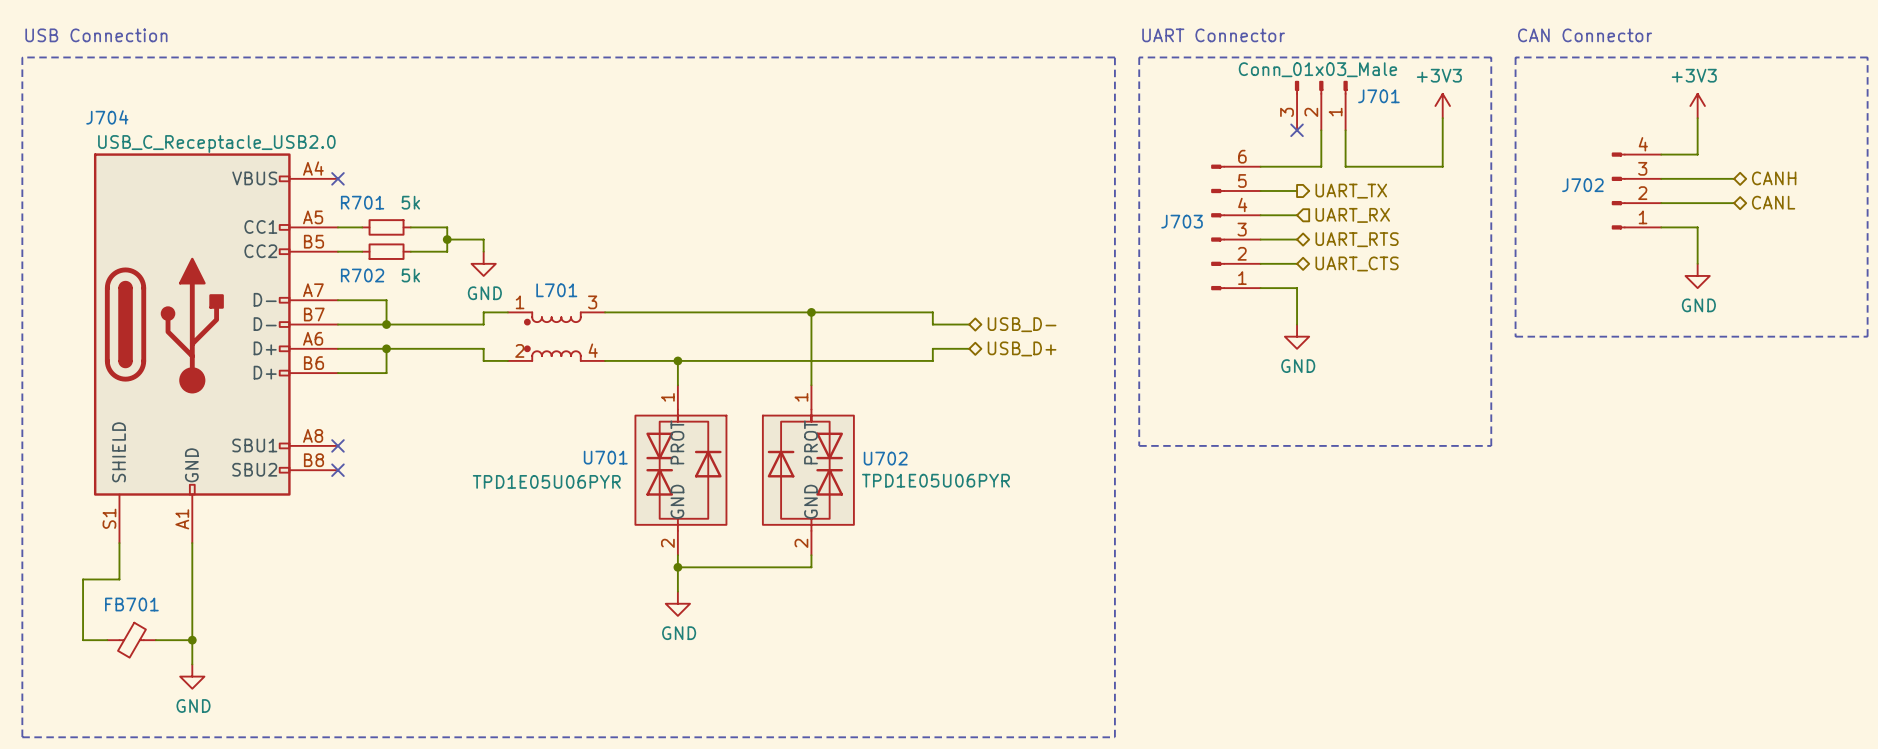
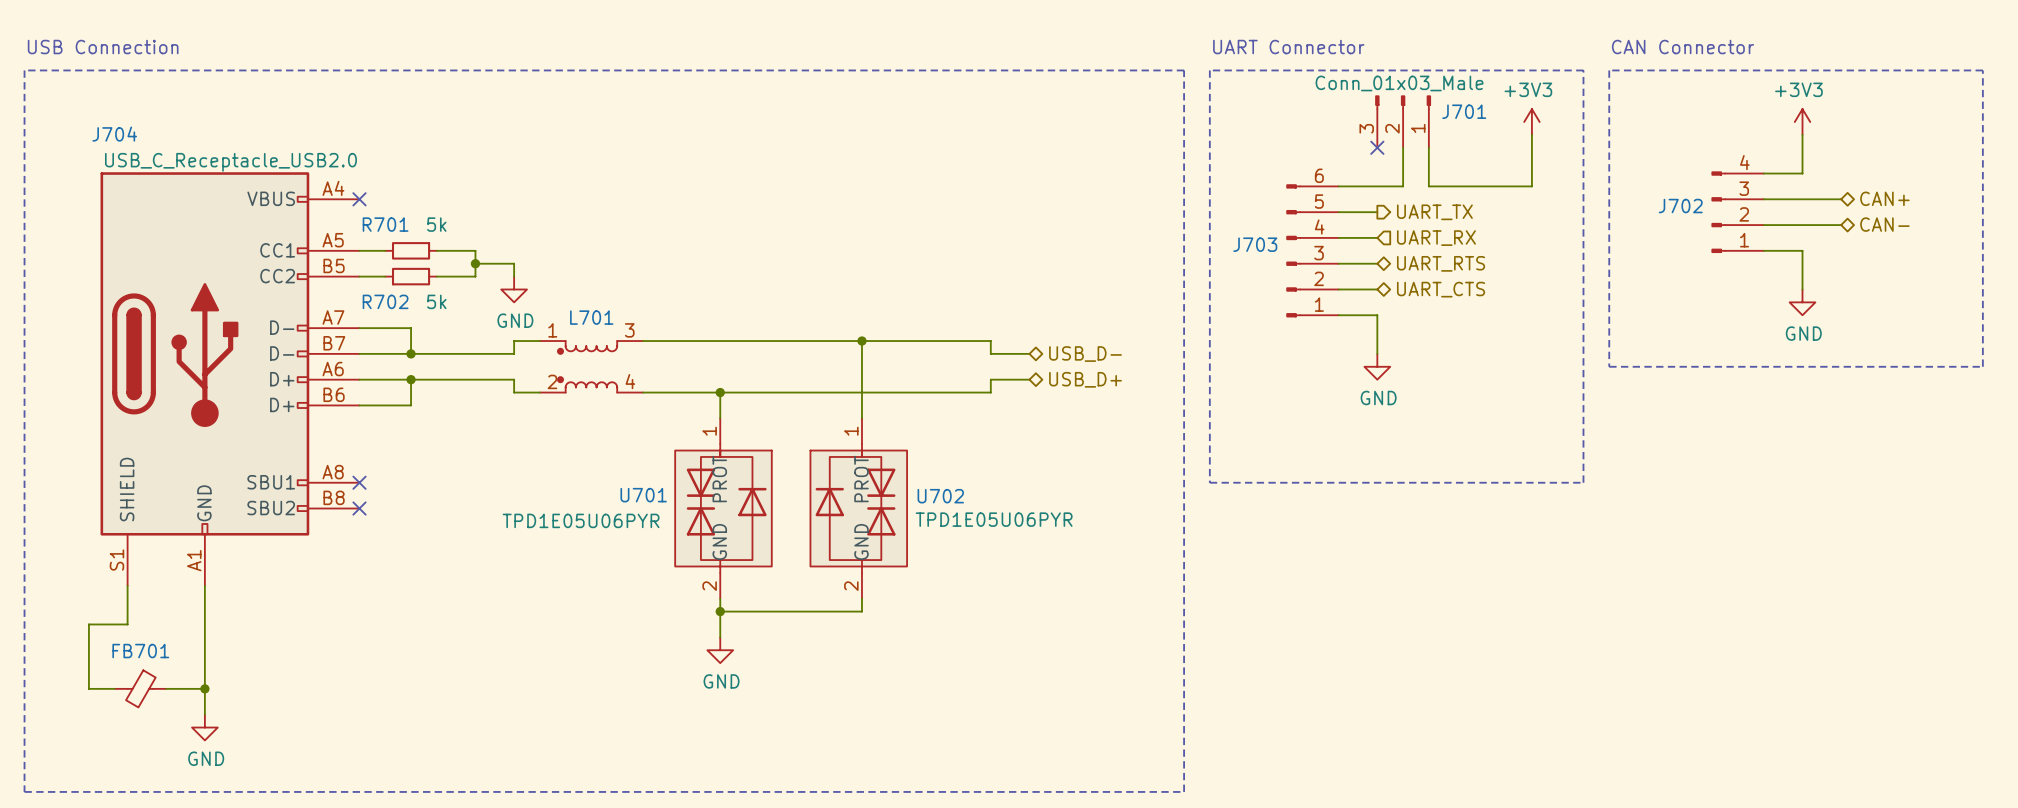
hierarchical label: CANH (1774, 178) -> CAN+ (1884, 198)
hierarchical label: CANL (1773, 202) -> CAN- (1884, 224)

